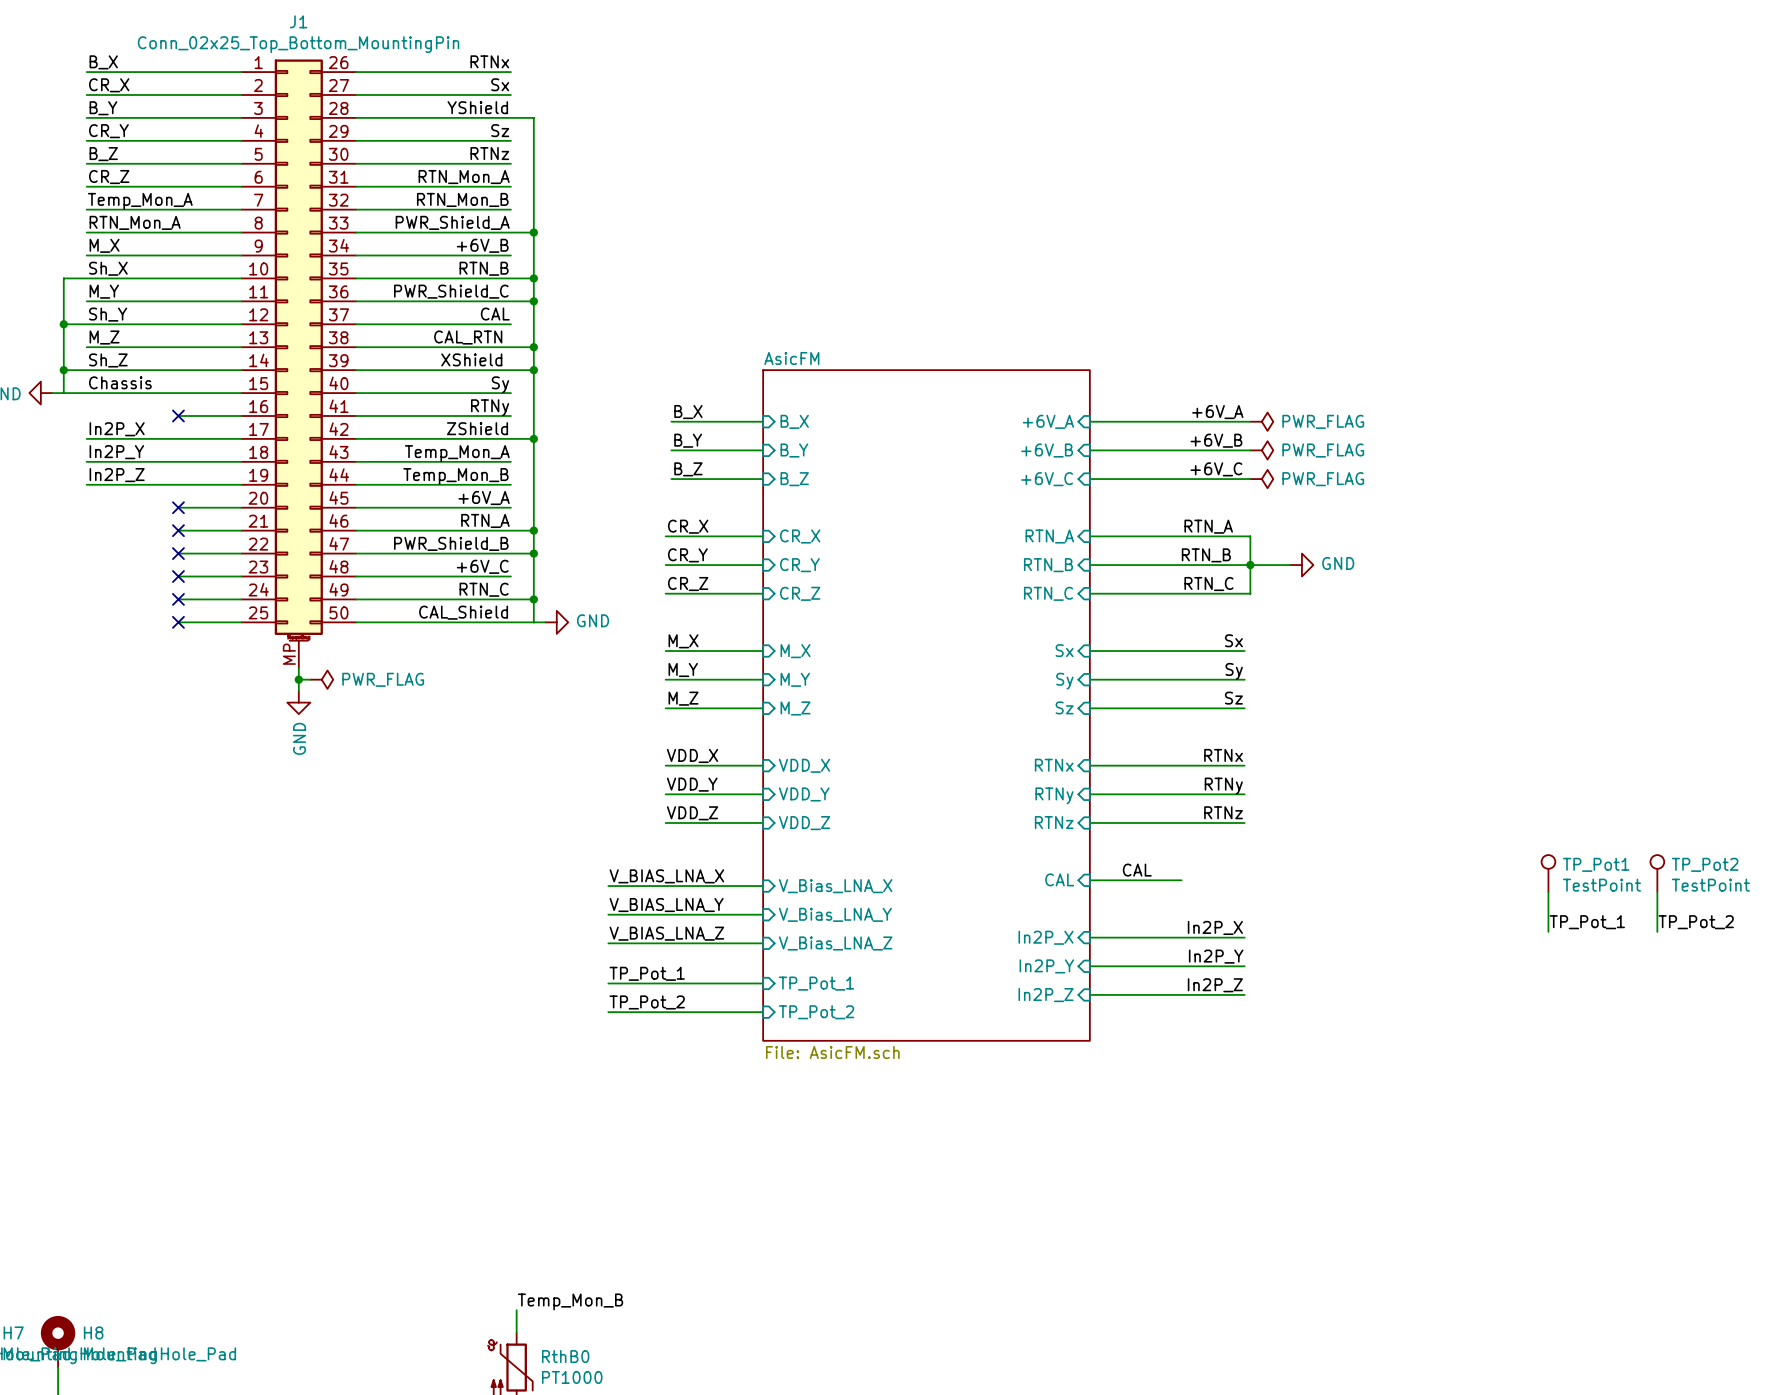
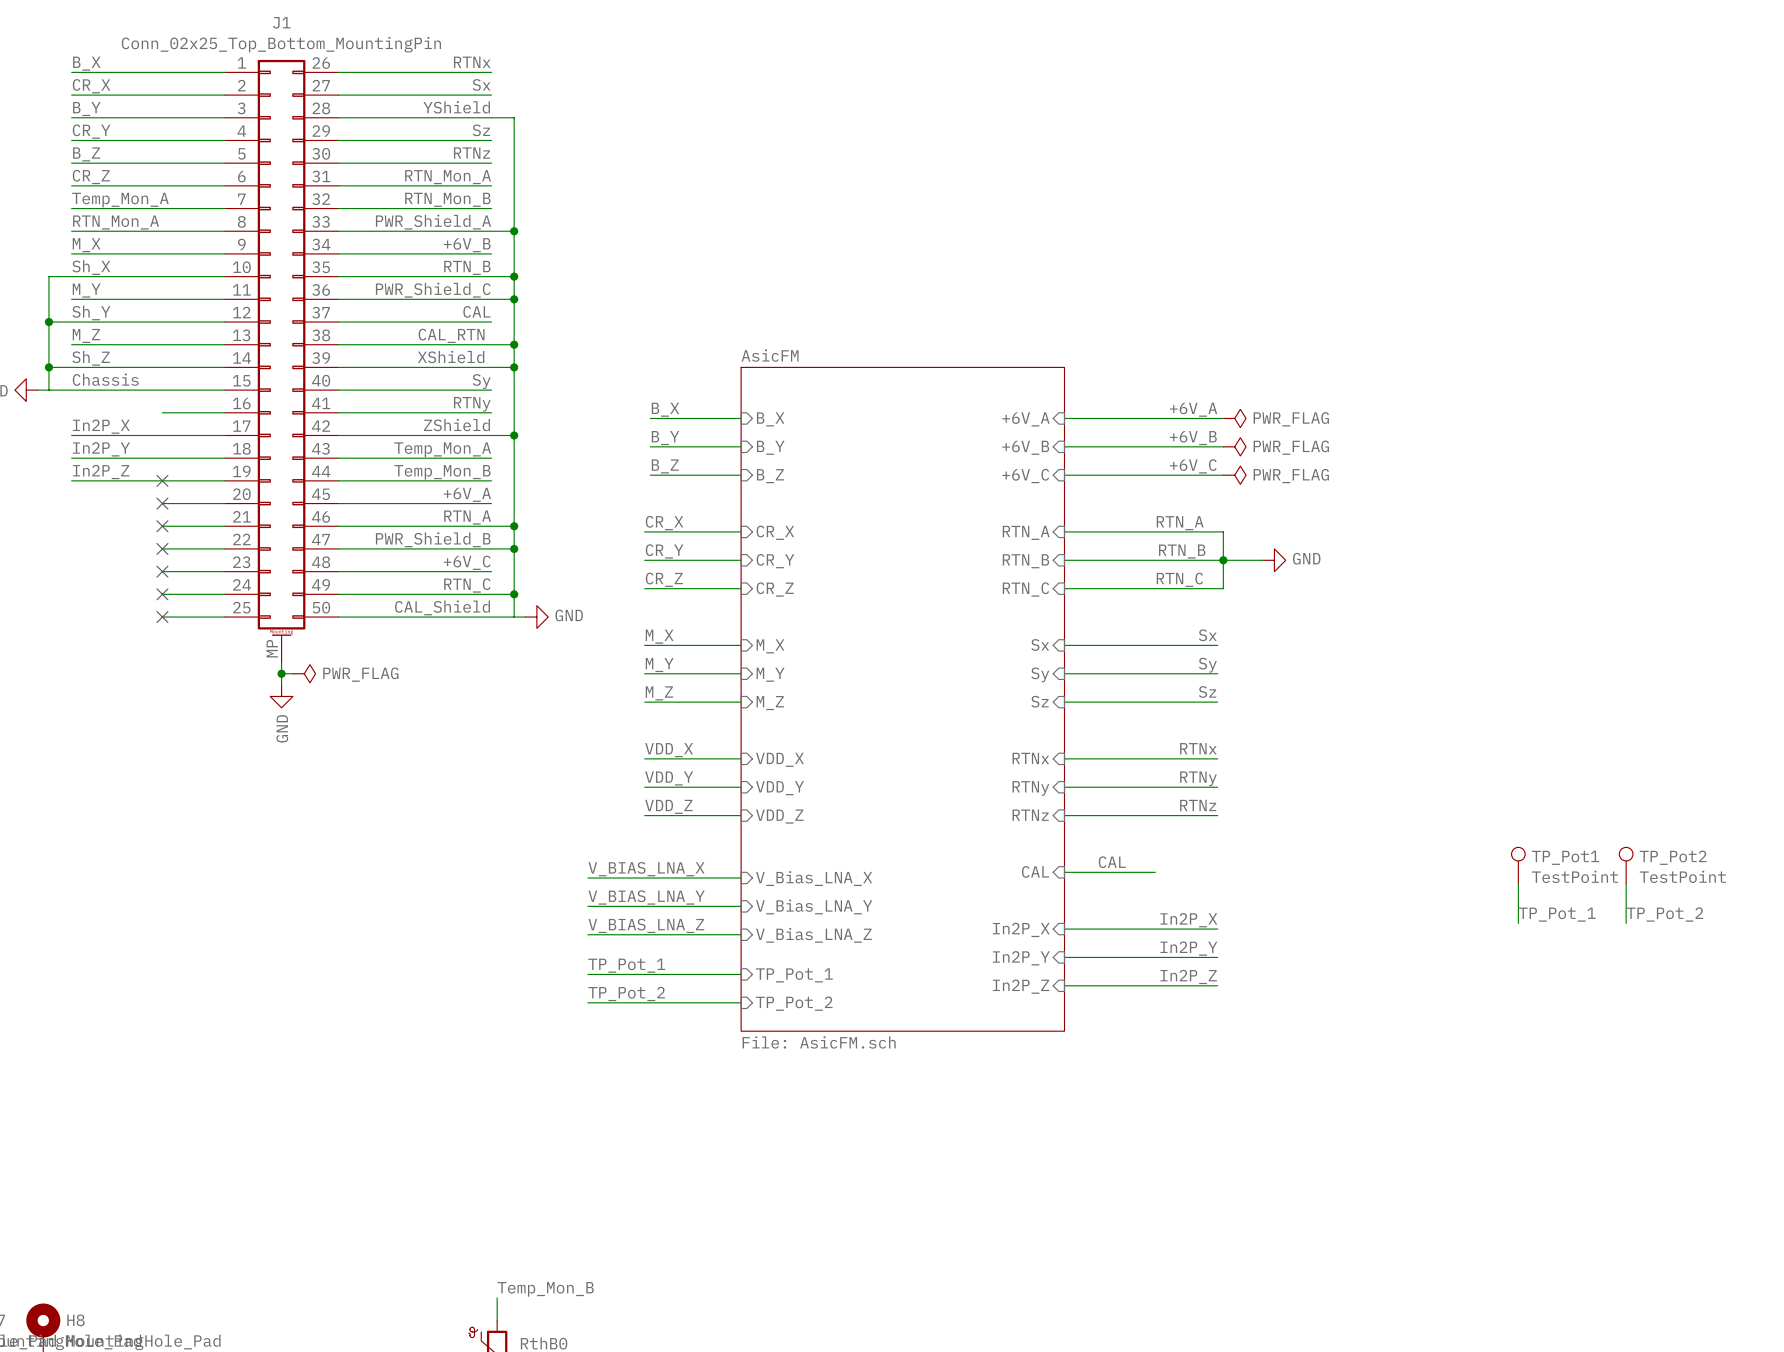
no-connect mark: (178, 416) -> none
no-connect mark: none -> (162, 480)

